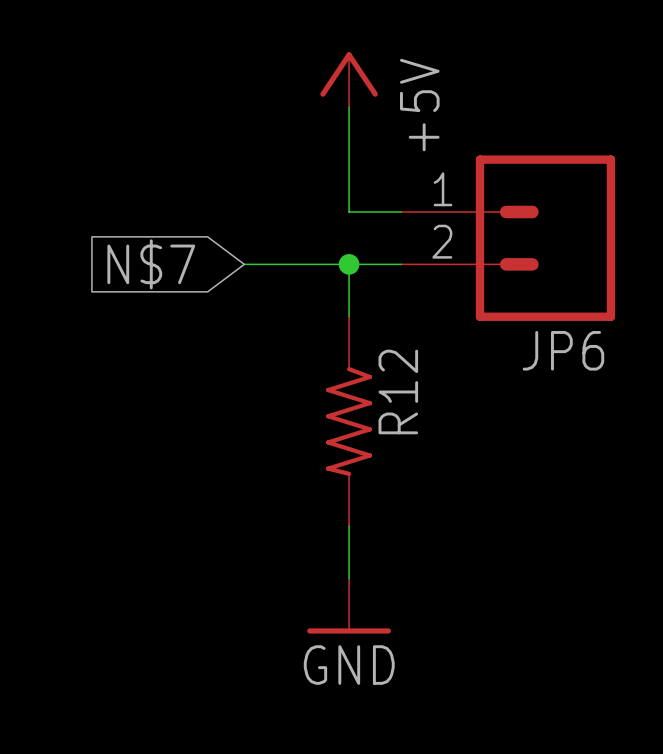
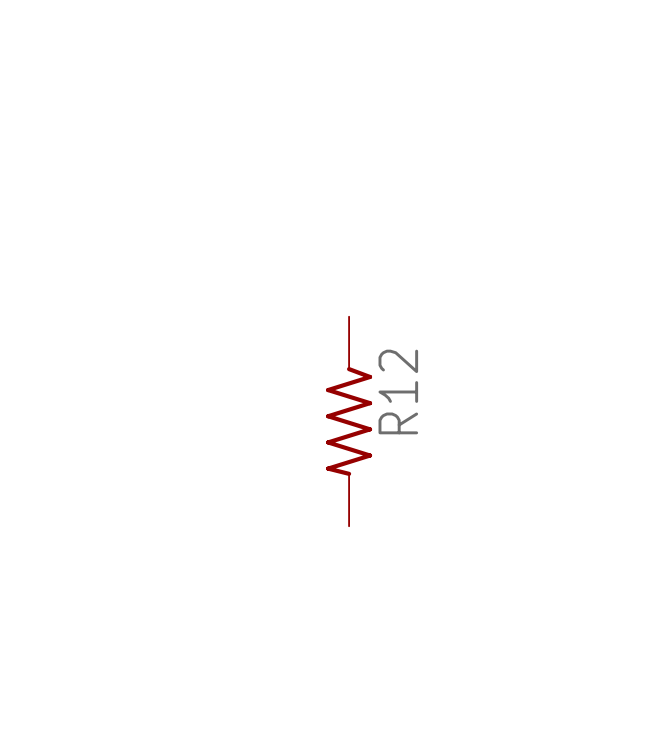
power symbol: +5V (349, 79) -> none
wire: (349, 107) (349, 211) (401, 211) -> none
JP6: (508, 238) -> none
global label: N$7 (151, 264) -> none
wire: (244, 264) (401, 264) -> none
wire: (349, 264) (349, 316) -> none
junction: (349, 264) -> none
wire: (349, 526) (349, 578) -> none
power symbol: GND (349, 606) -> none

